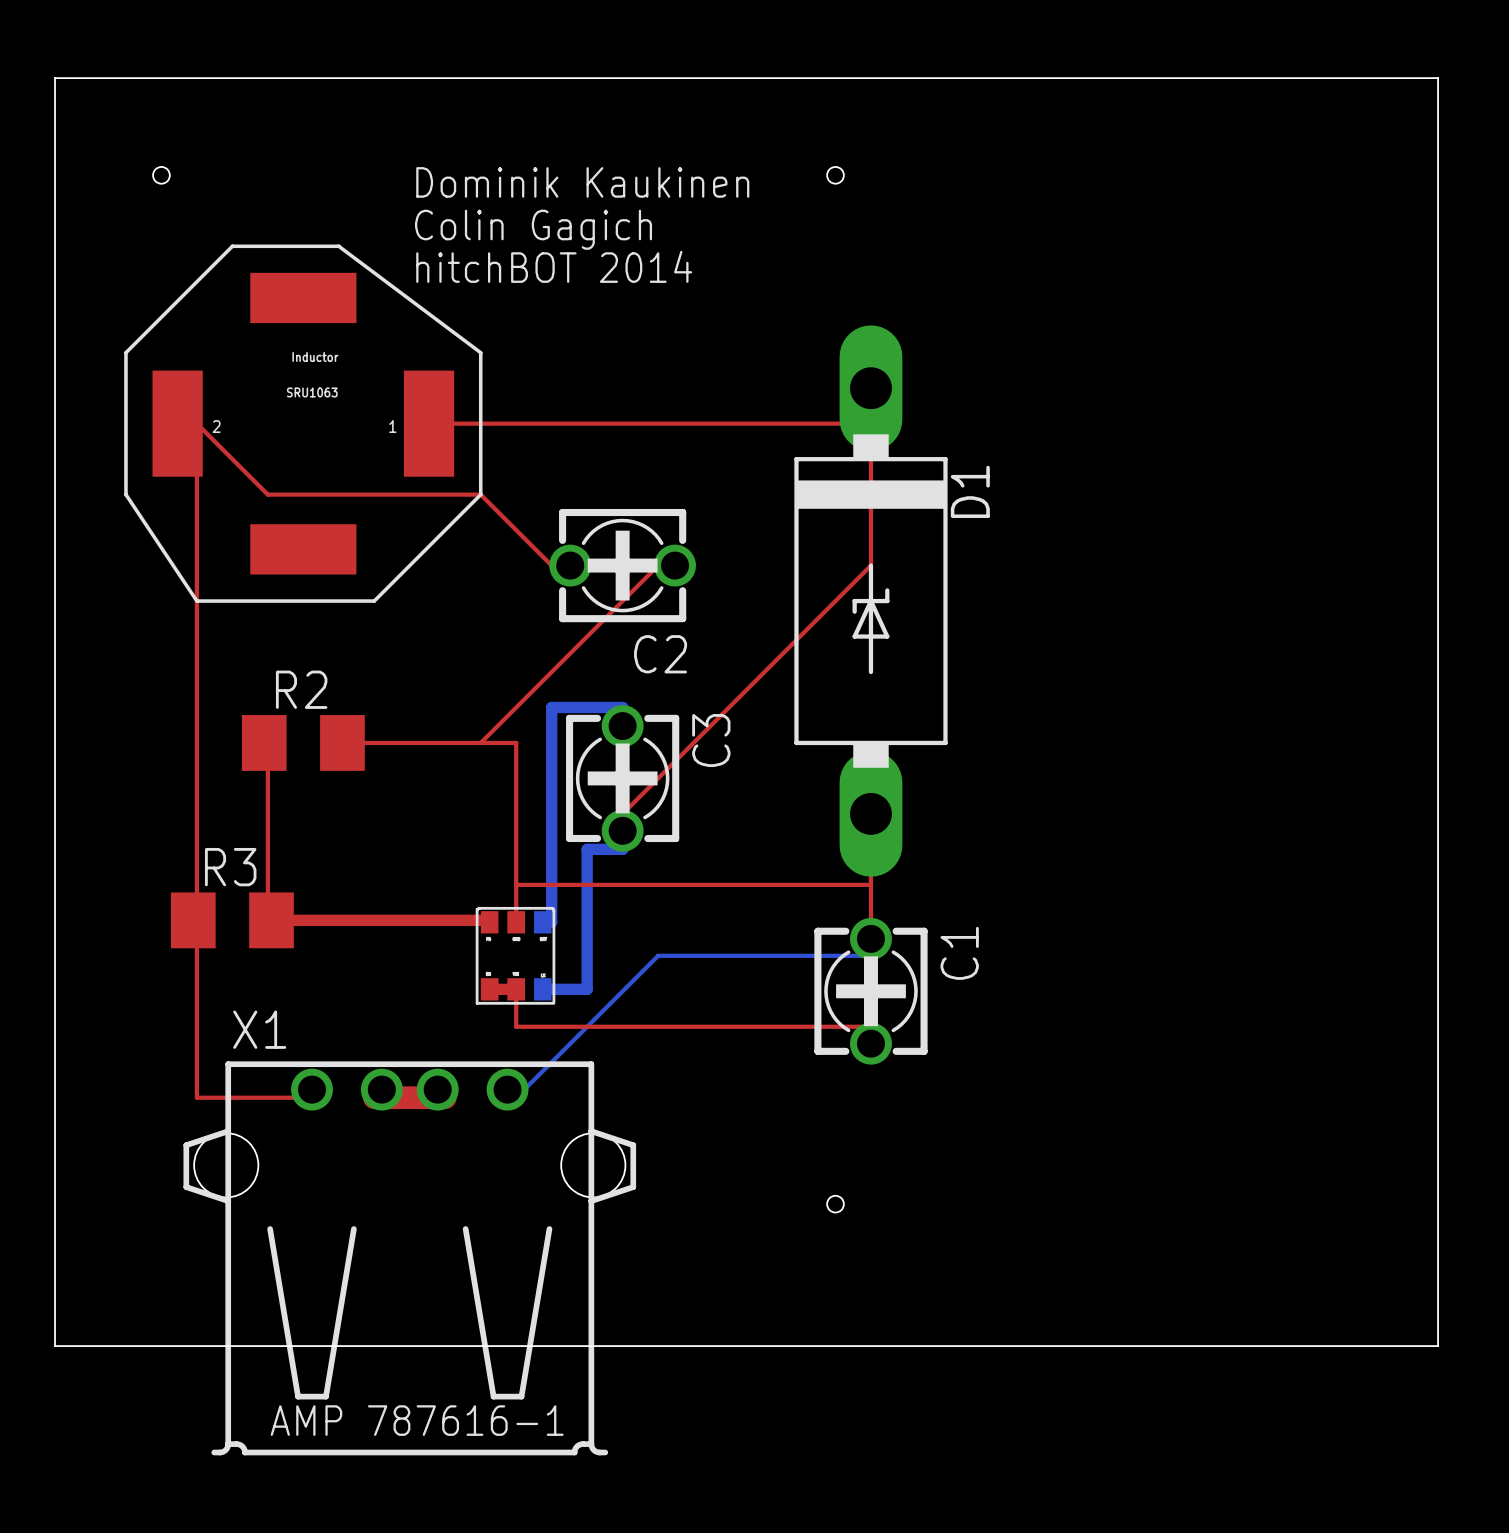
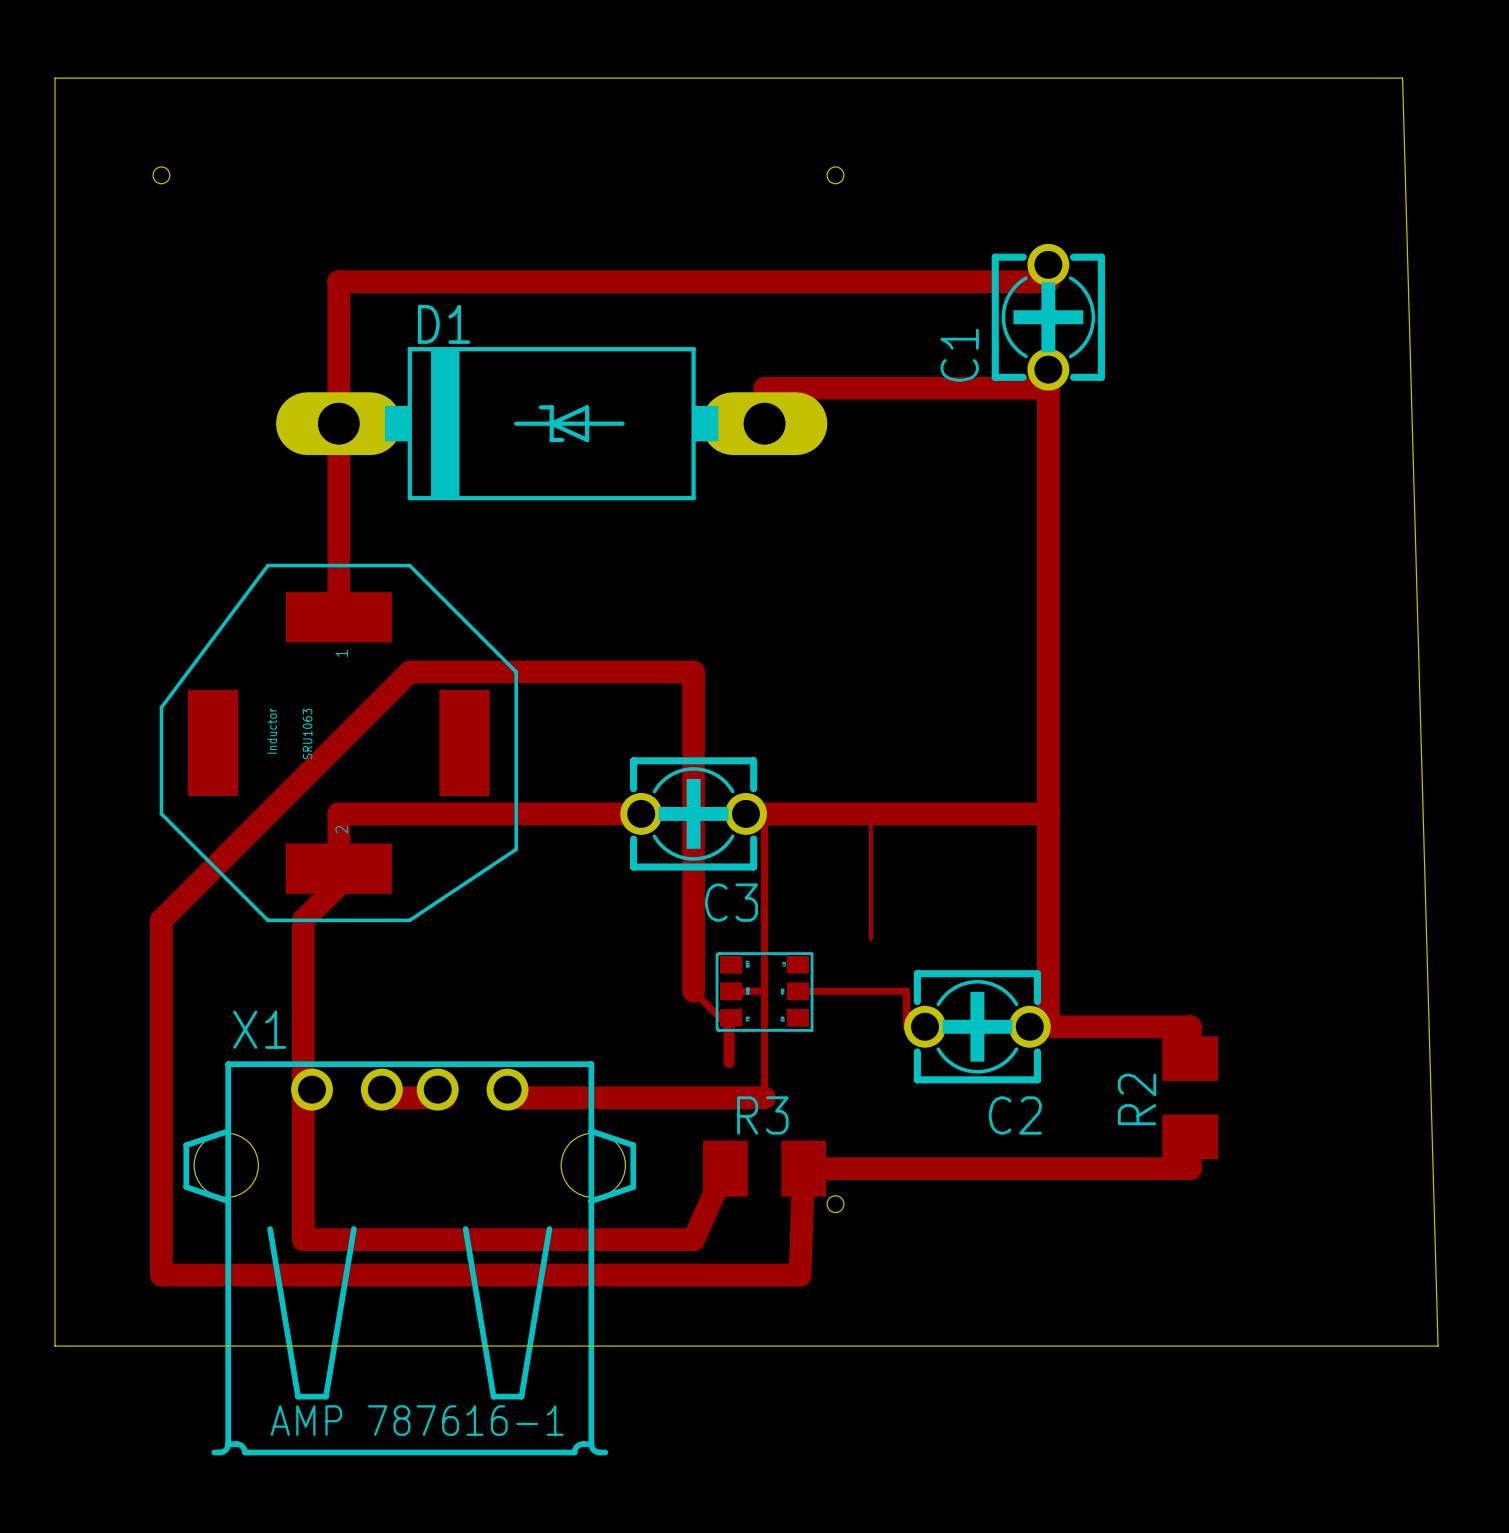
board edge: (1402, 78) (1438, 78) (1438, 1346) -> (1402, 78) (1438, 1346)
text: Dominik Kaukinen (582, 182) -> none
text: Colin Gagich (533, 229) -> none
top track: none -> (1048, 264) (1048, 281) (338, 281) (338, 617)
text: hitchBOT 2014 (554, 266) -> none
top track: (870, 388) (870, 565) (622, 813) (622, 830) -> none
top track: none -> (1048, 388) (764, 388) (764, 423)
top track: none -> (1048, 388) (1048, 1026)
top track: (196, 423) (196, 1097) (303, 1097) -> none
top track: (196, 423) (267, 494) (480, 494) (551, 565) (570, 565) -> none
part rotation: 0° (303, 423) -> 90° counterclockwise (338, 742)
part position: (303, 423) -> (338, 742)
top track: (429, 423) (870, 423) -> none
C2 position: (622, 565) -> (977, 1026)
top track: (675, 565) (658, 565) (480, 742) -> none
D1 rotation: 0° (870, 601) -> 90° counterclockwise (551, 423)
D1 position: (870, 601) -> (551, 423)
R2 name position: R2 (301, 689) -> R2 (1137, 1099)
bottom track: (622, 726) (622, 707) (551, 707) (551, 922) (542, 922) -> none
top track: (264, 742) (267, 742) (267, 920) (489, 920) (489, 922) -> none
R2 rotation: 0° (303, 742) -> 90° clockwise (1190, 1097)
R2 position: (303, 742) -> (1190, 1097)
top track: (338, 742) (516, 742) (516, 922) -> none
C3 rotation: 0° (622, 778) -> 90° clockwise (693, 813)
top track: none -> (641, 813) (338, 813) (338, 884) (303, 920) (303, 1239) (693, 1239) (725, 1168)
top track: none -> (764, 813) (764, 1097) (516, 1097) (507, 1089)
top track: none -> (764, 813) (1048, 813)
bottom track: (622, 830) (622, 849) (587, 849) (587, 989) (542, 989) -> none
top track: (516, 884) (870, 884) -> none
R3 position: (232, 920) -> (764, 1168)
bottom track: (870, 938) (870, 955) (658, 955) (516, 1097) (507, 1089) -> none
C1 name position: C1 (959, 953) -> C1 (959, 355)
part: (515, 955) -> none
top track: (489, 989) (516, 989) (516, 1026) (870, 1026) (870, 1043) -> none
top track: none -> (729, 991) (764, 991)
part: none -> (764, 991)
top track: none -> (798, 991) (906, 991) (906, 1026) (925, 1026)
C1 position: (870, 991) -> (1048, 317)
top track: none -> (731, 1017) (729, 1017) (729, 1062)
top track: none -> (729, 1026) (693, 991) (693, 672) (409, 672) (161, 920) (161, 1275) (800, 1275) (803, 1168) (1190, 1168) (1190, 1136)
top track: none -> (1048, 1026) (1190, 1026) (1190, 1058)

